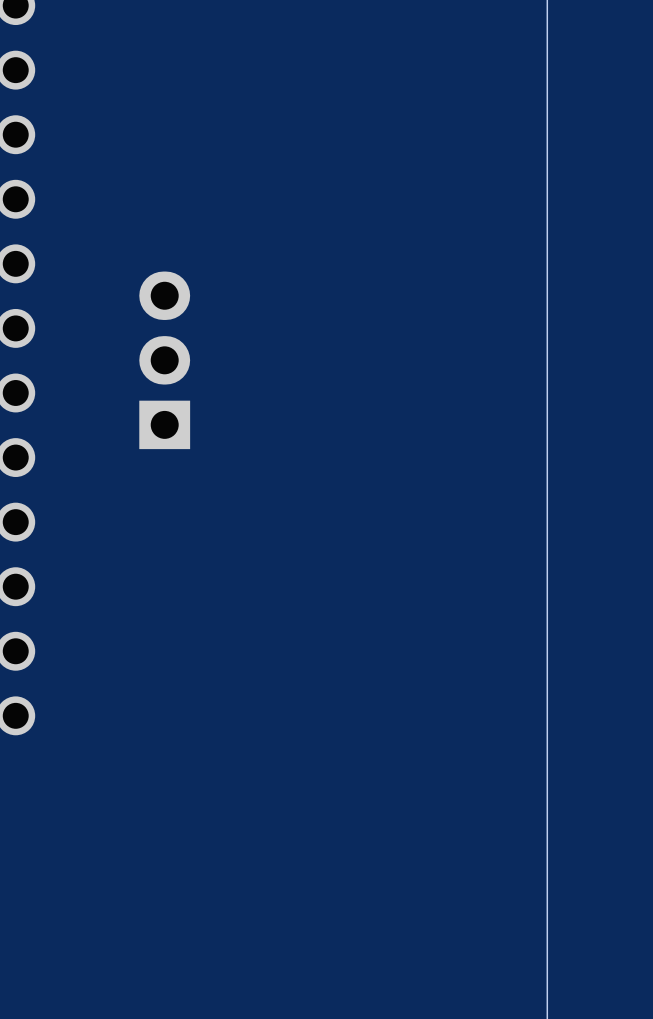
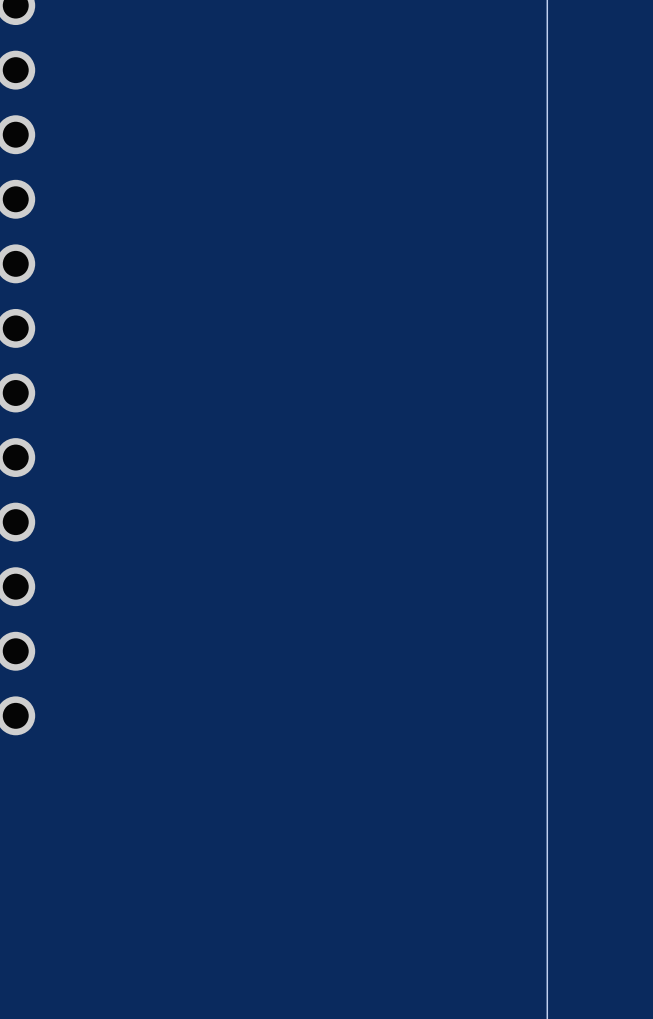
part: (164, 360) -> none

